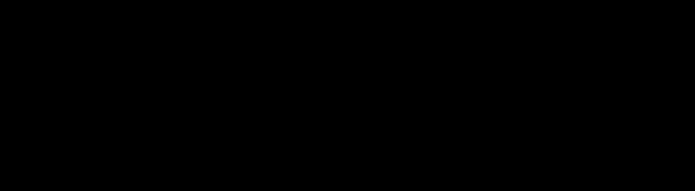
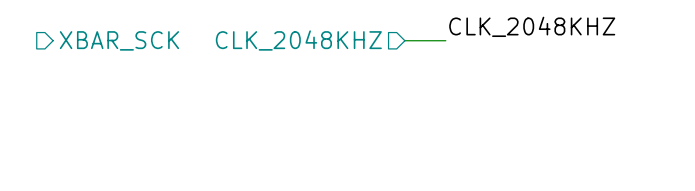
label: none -> CLK_2048KHZ (532, 26)
sheet pin: none -> XBAR_SCK (119, 40)
sheet pin: none -> CLK_2048KHZ (298, 40)
wire: none -> (404, 40) (445, 40)

